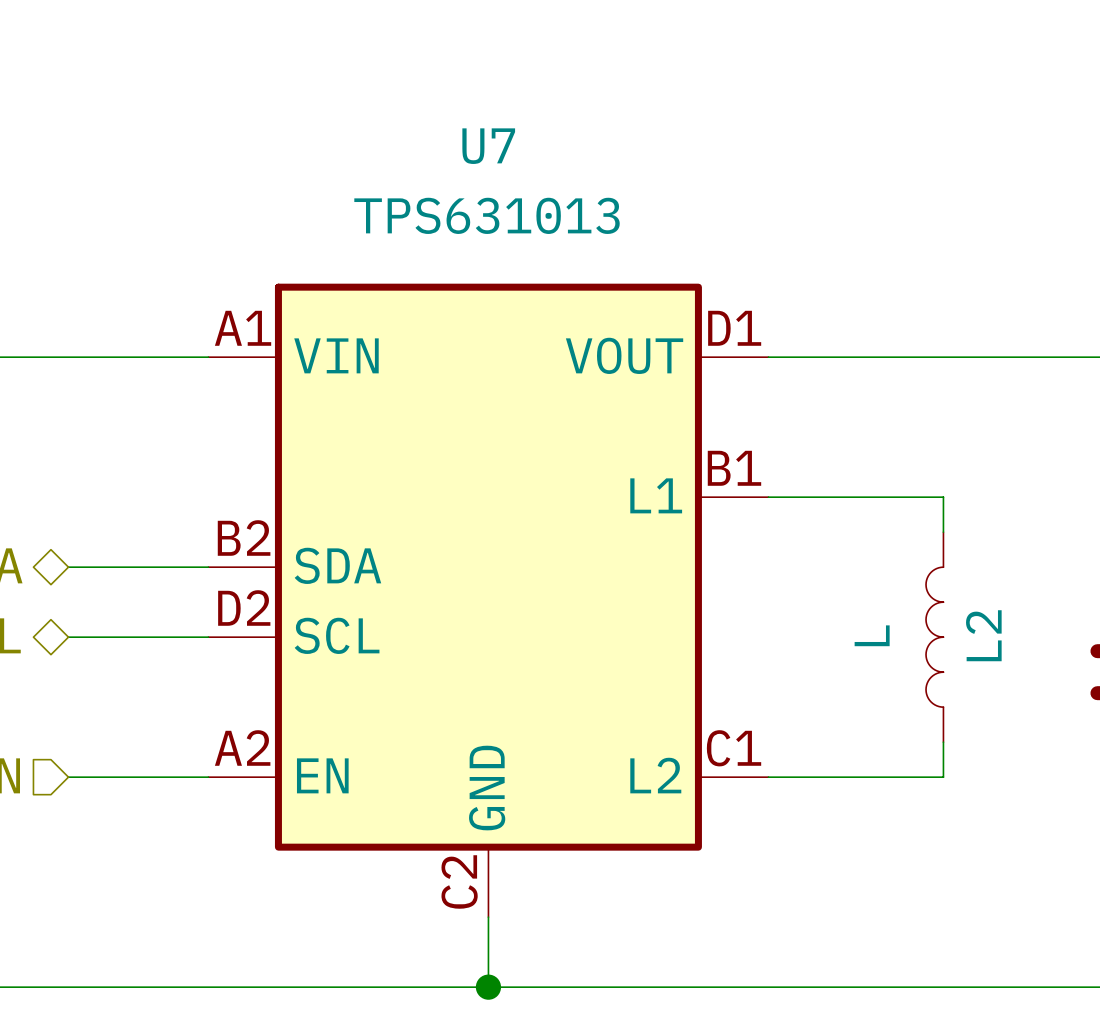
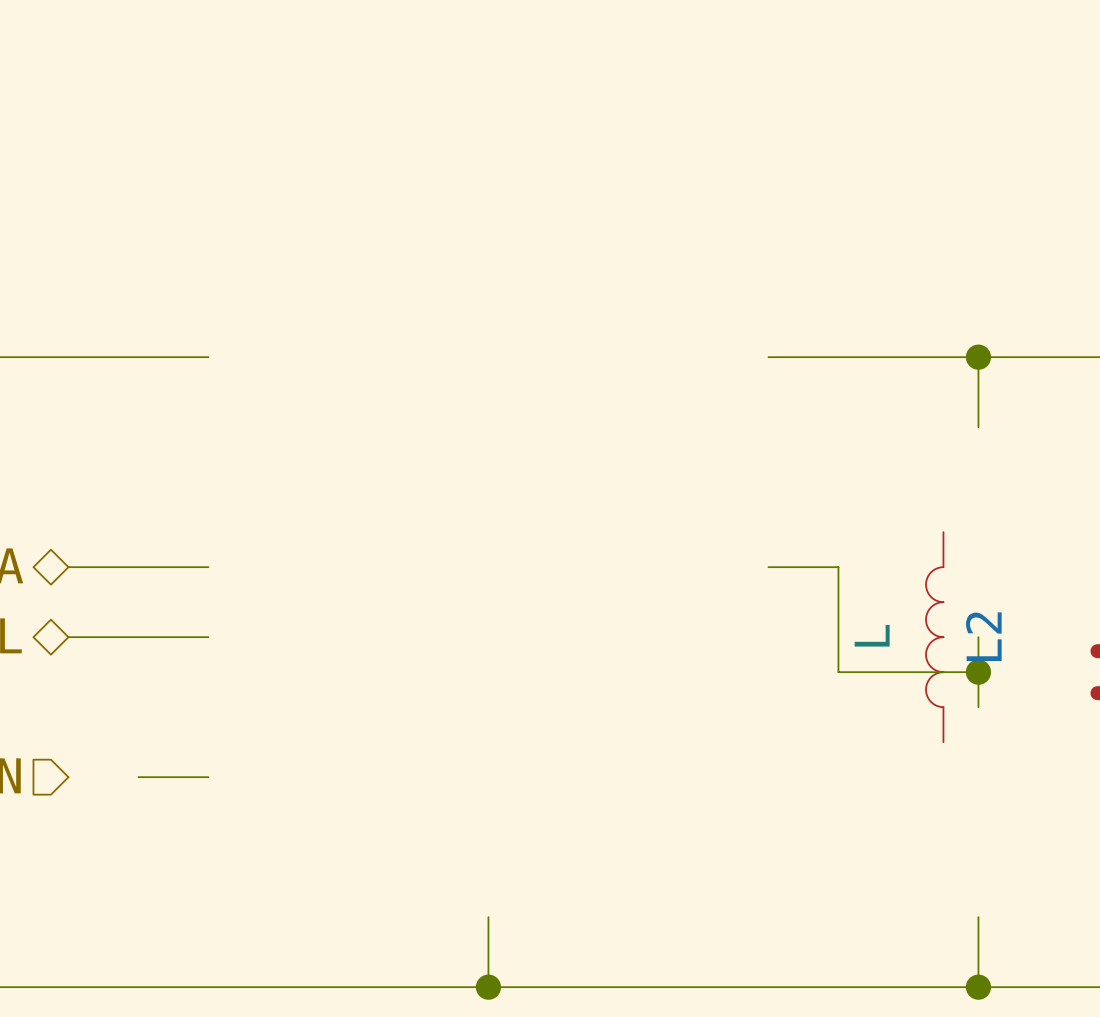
wire: none -> (978, 357) (978, 427)
junction: none -> (978, 357)
wire: (768, 497) (943, 497) (943, 532) -> none
wire: none -> (768, 567) (838, 567) (838, 672) (978, 672)
U7: TPS631013 (488, 600) -> none
wire: none -> (978, 637) (978, 707)
junction: none -> (978, 672)
wire: (943, 742) (943, 777) (768, 777) -> none
wire: (68, 777) (138, 777) -> none
wire: none -> (978, 917) (978, 987)
junction: none -> (978, 987)

